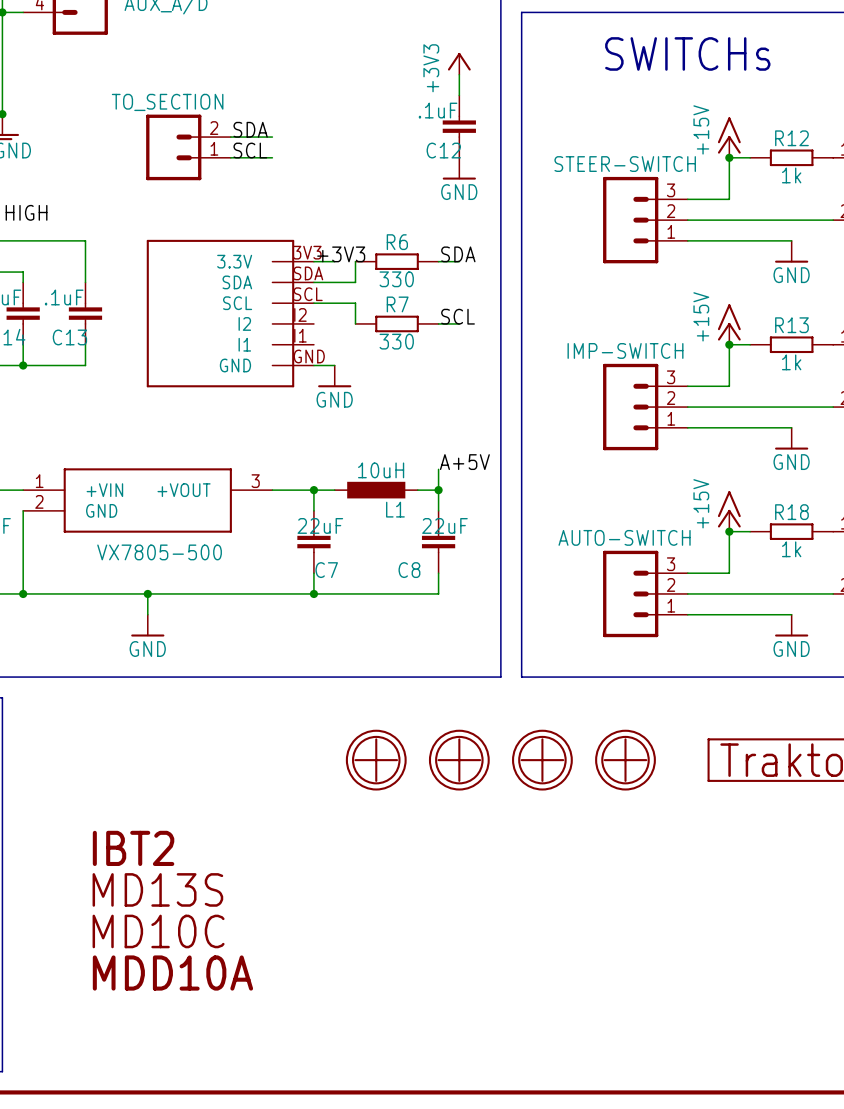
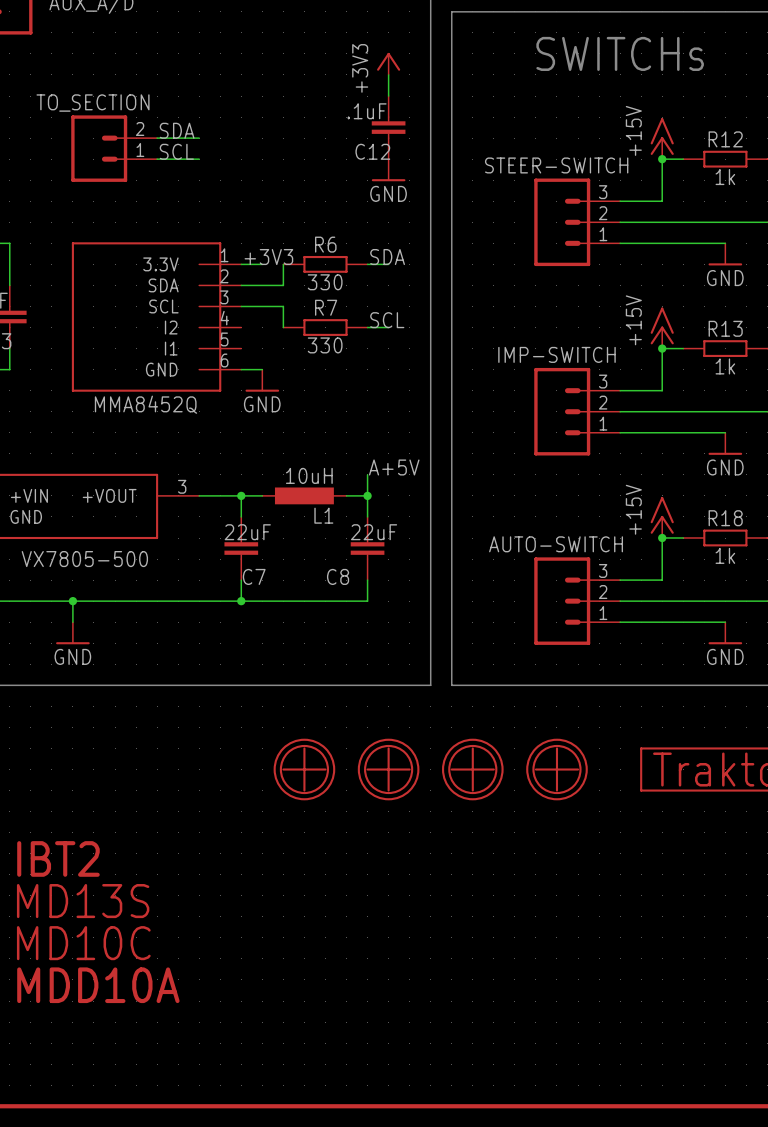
part pin number: 3V3 (307, 252) -> 1 (224, 255)
part pin number: SDA (308, 273) -> 2 (224, 276)
part pin number: SCL (308, 294) -> 3 (224, 297)
part pin number: I2 (300, 314) -> 4 (224, 318)
part pin number: I1 (300, 335) -> 5 (224, 339)
part pin number: GND (309, 356) -> 6 (224, 360)
part value: none -> MMA8452Q (146, 404)

